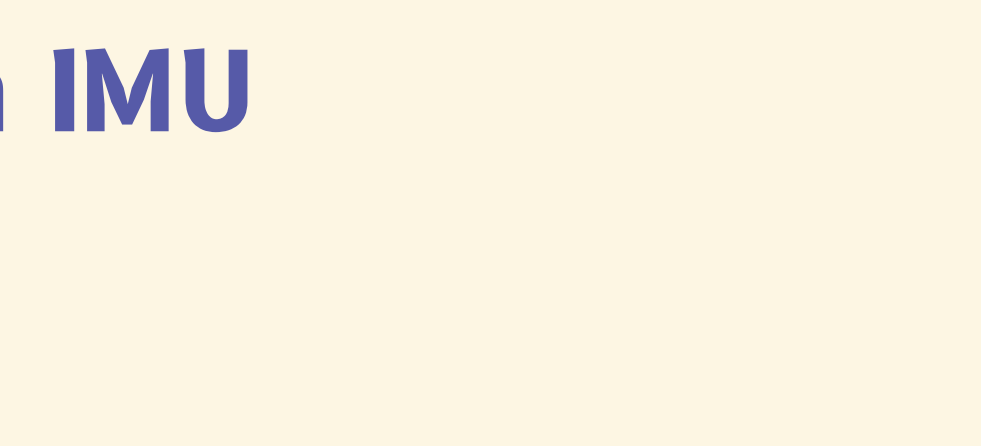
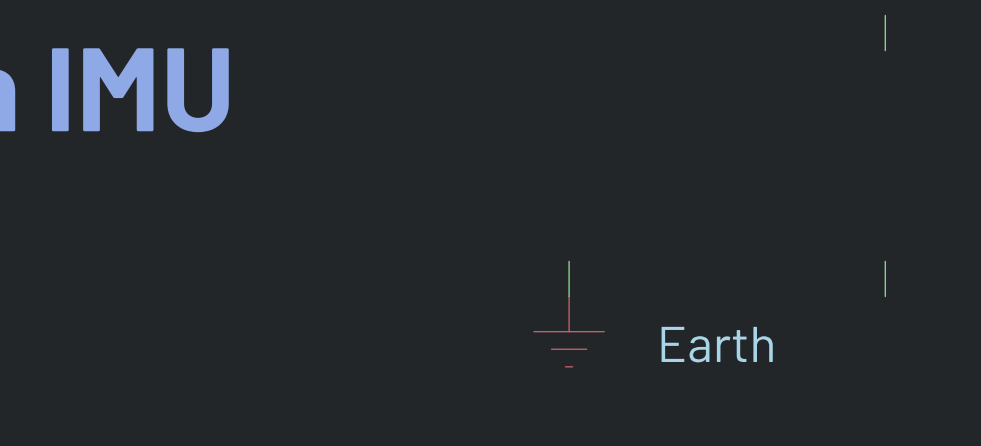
wire: none -> (885, 15) (885, 50)
wire: none -> (569, 261) (569, 296)
wire: none -> (885, 261) (885, 296)
power symbol: none -> Earth (569, 331)

